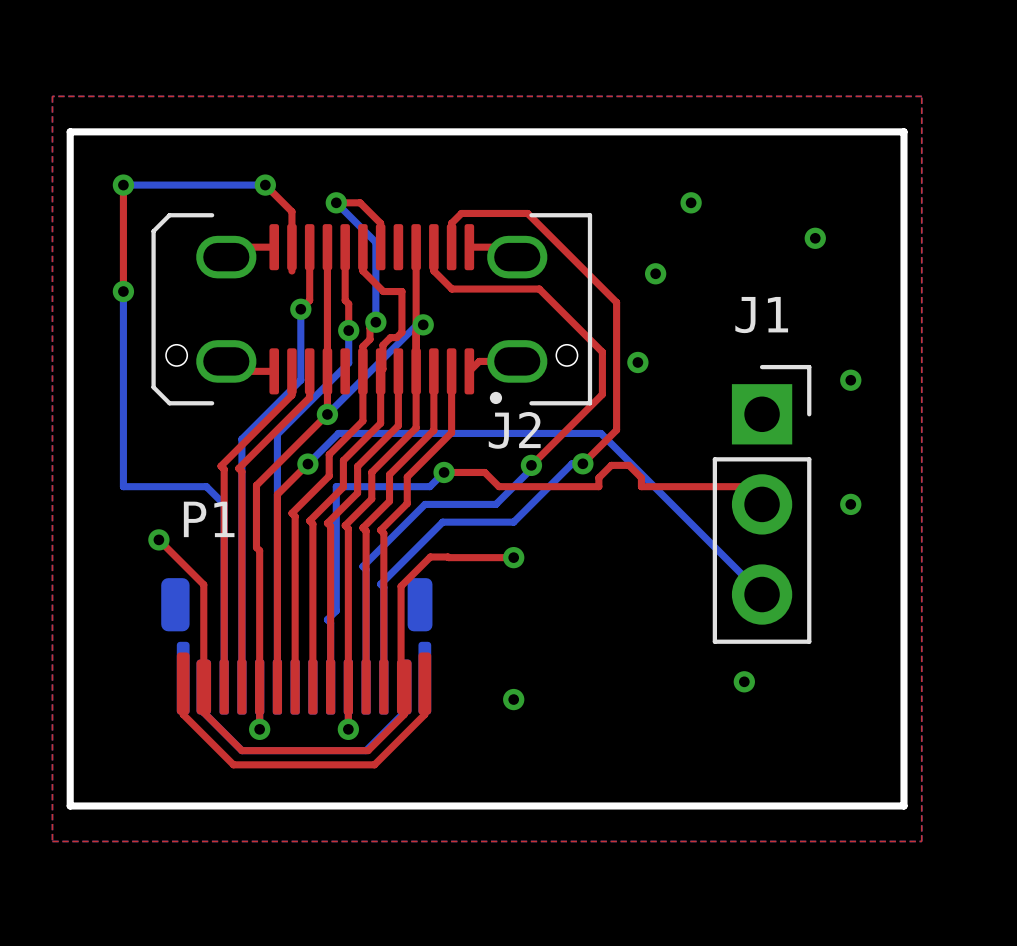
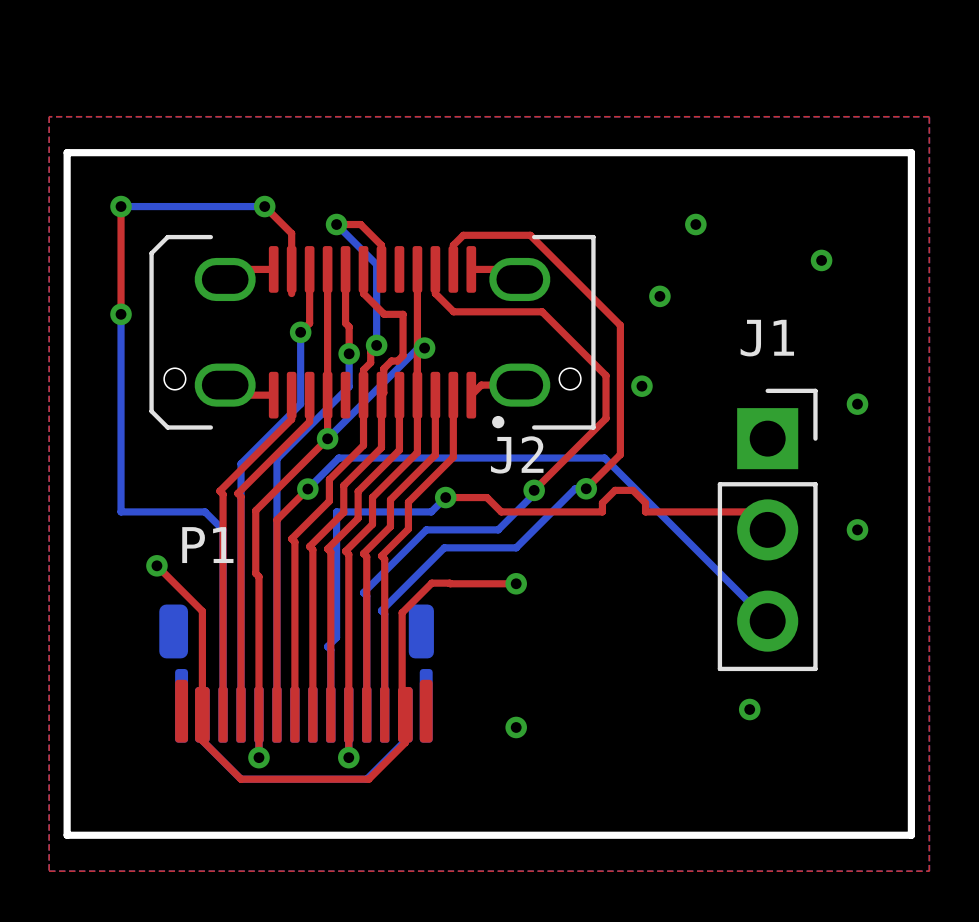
top track: (183, 683) (183, 714) (233, 764) (374, 764) (424, 714) (424, 683) -> none

